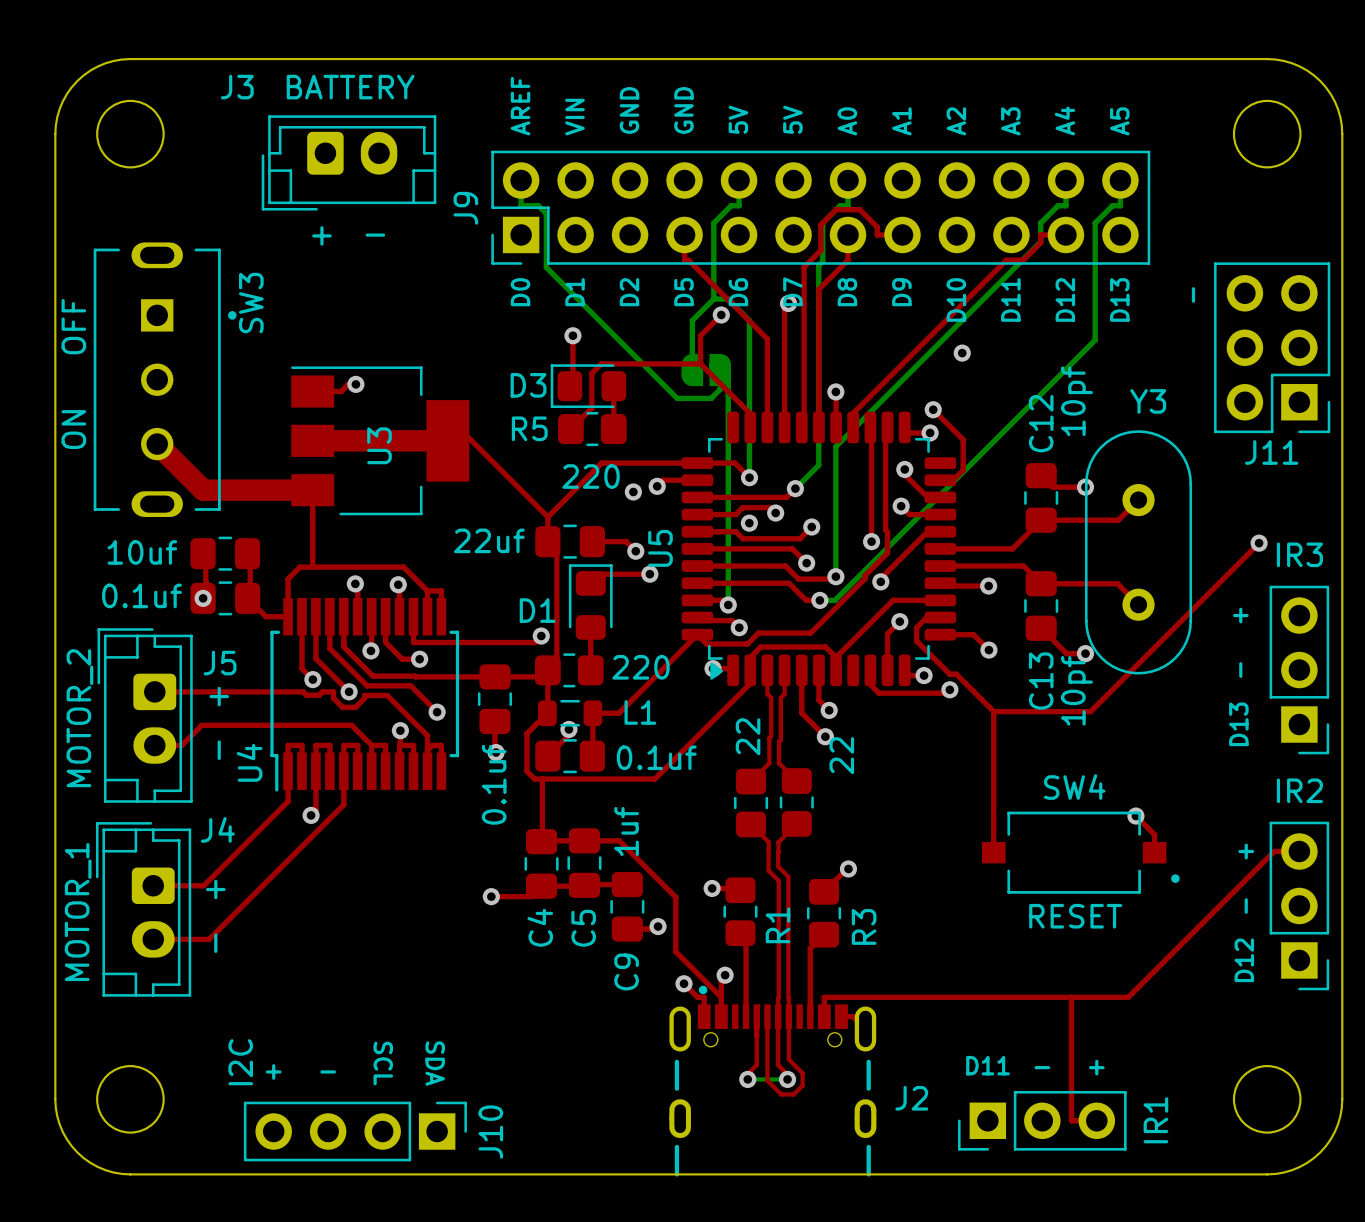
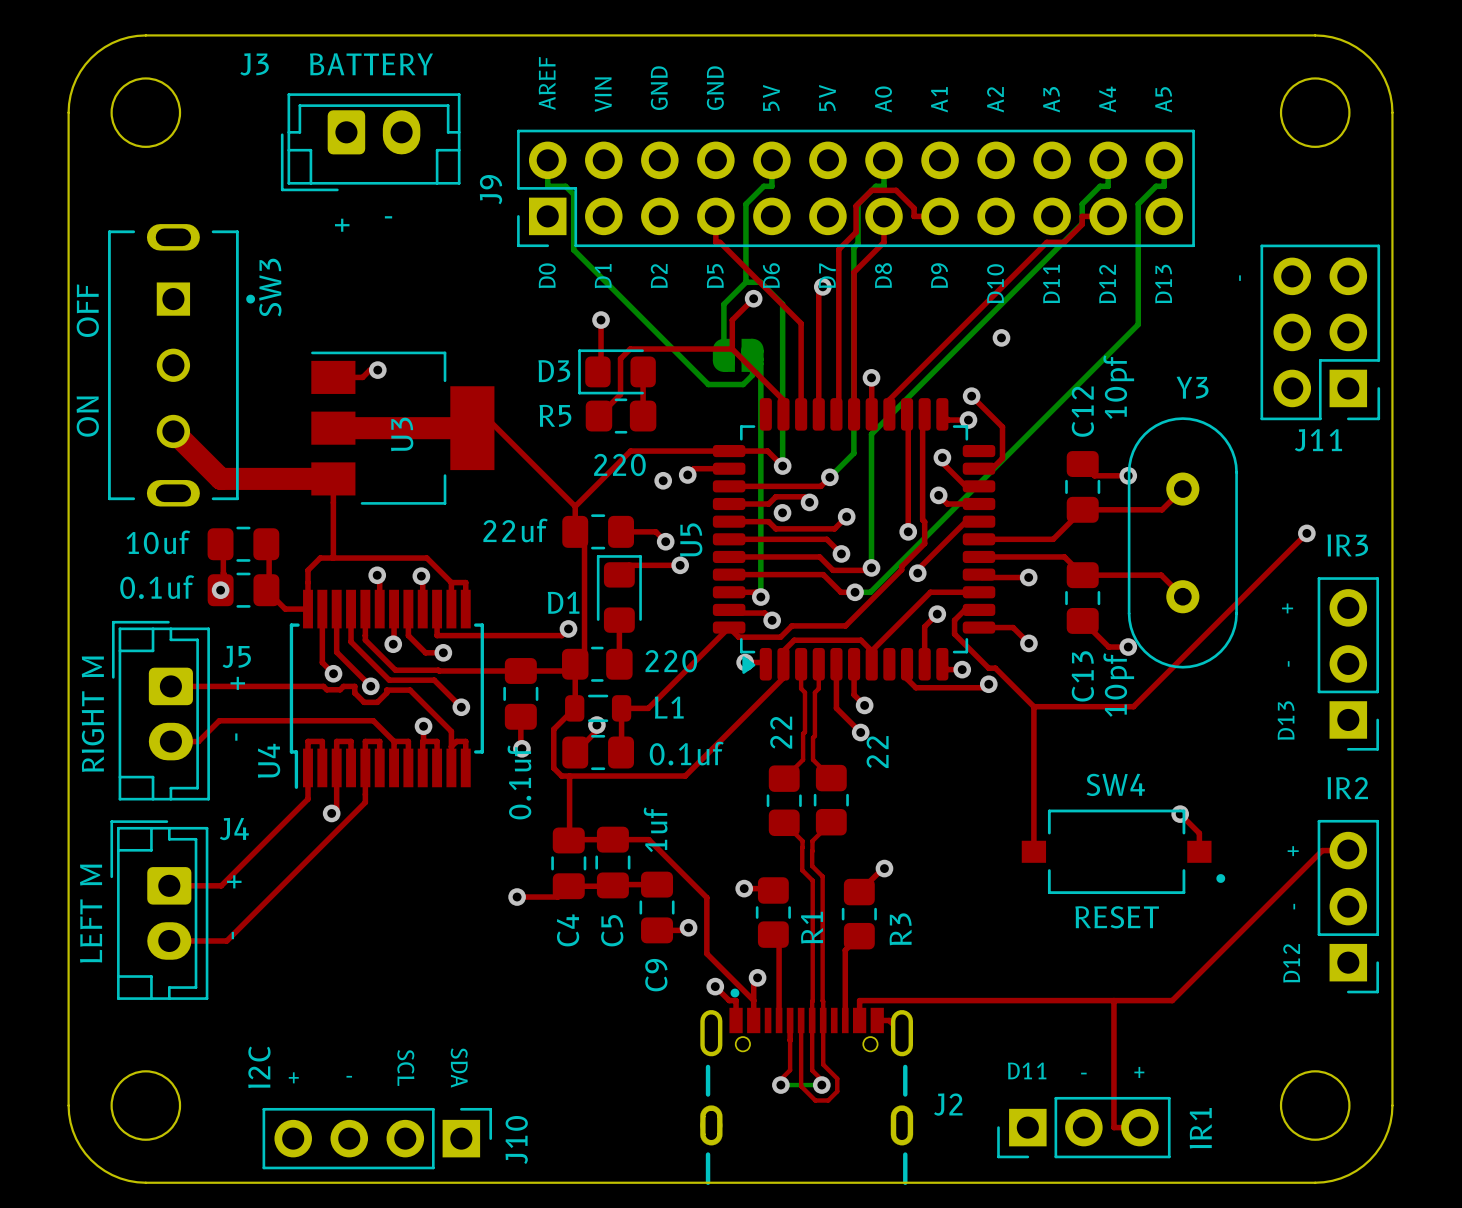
J5 value: MOTOR_2 (79, 718) -> RIGHT M (92, 714)
J4 value: MOTOR_1 (78, 912) -> LEFT M (91, 913)

